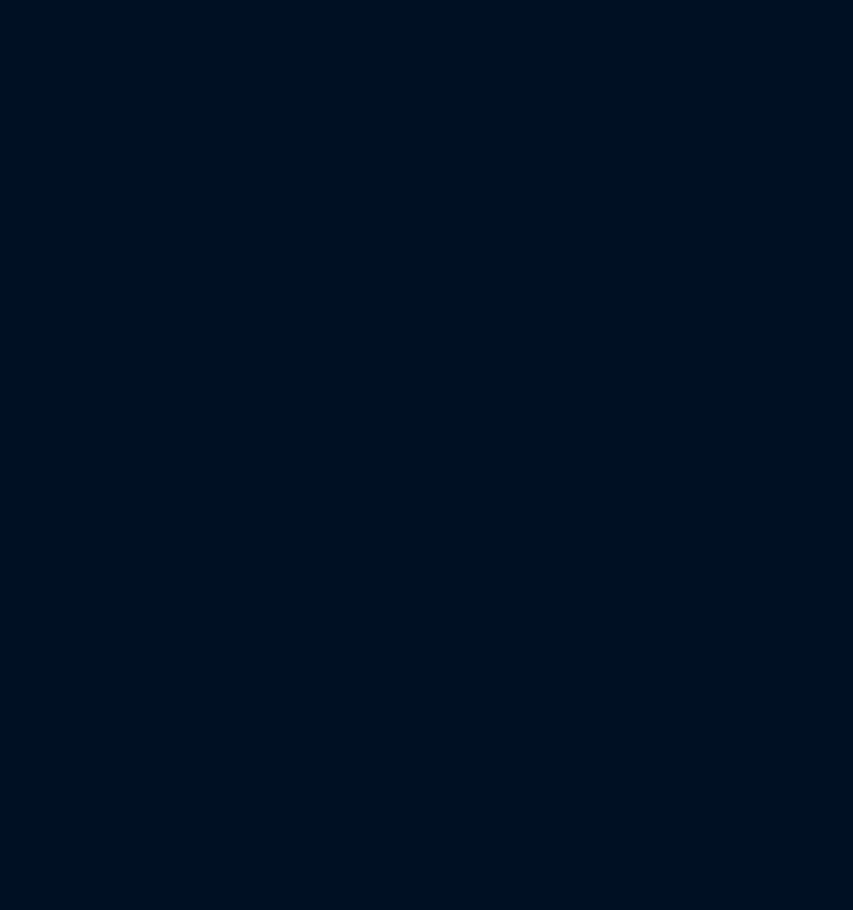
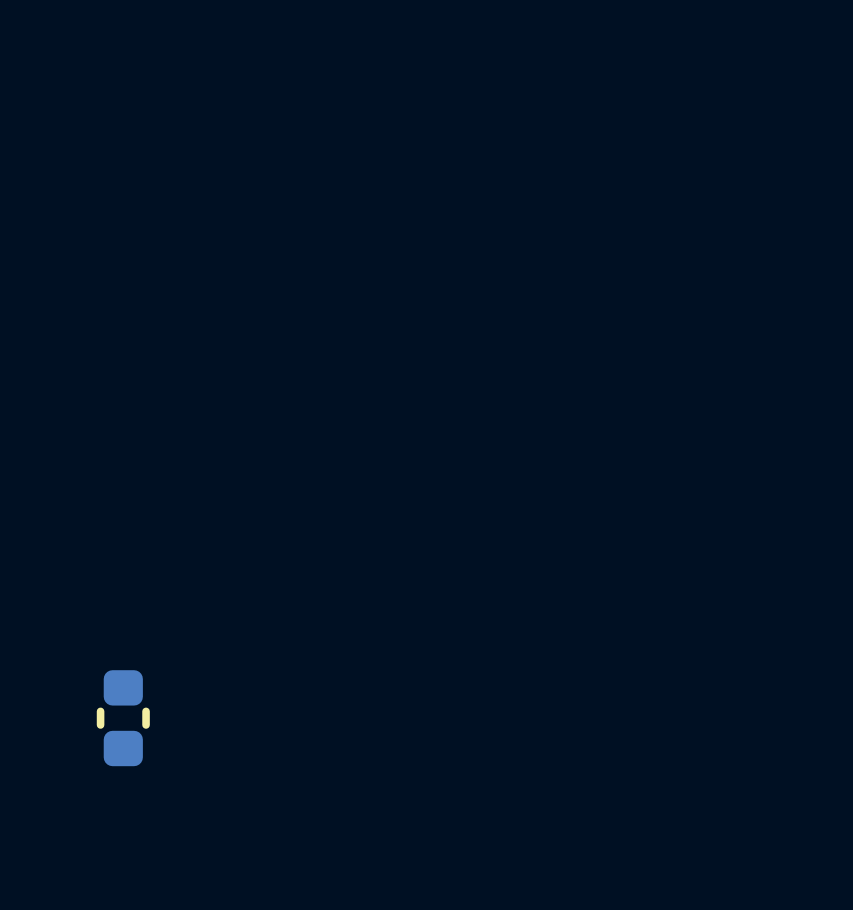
part: none -> (123, 718)

